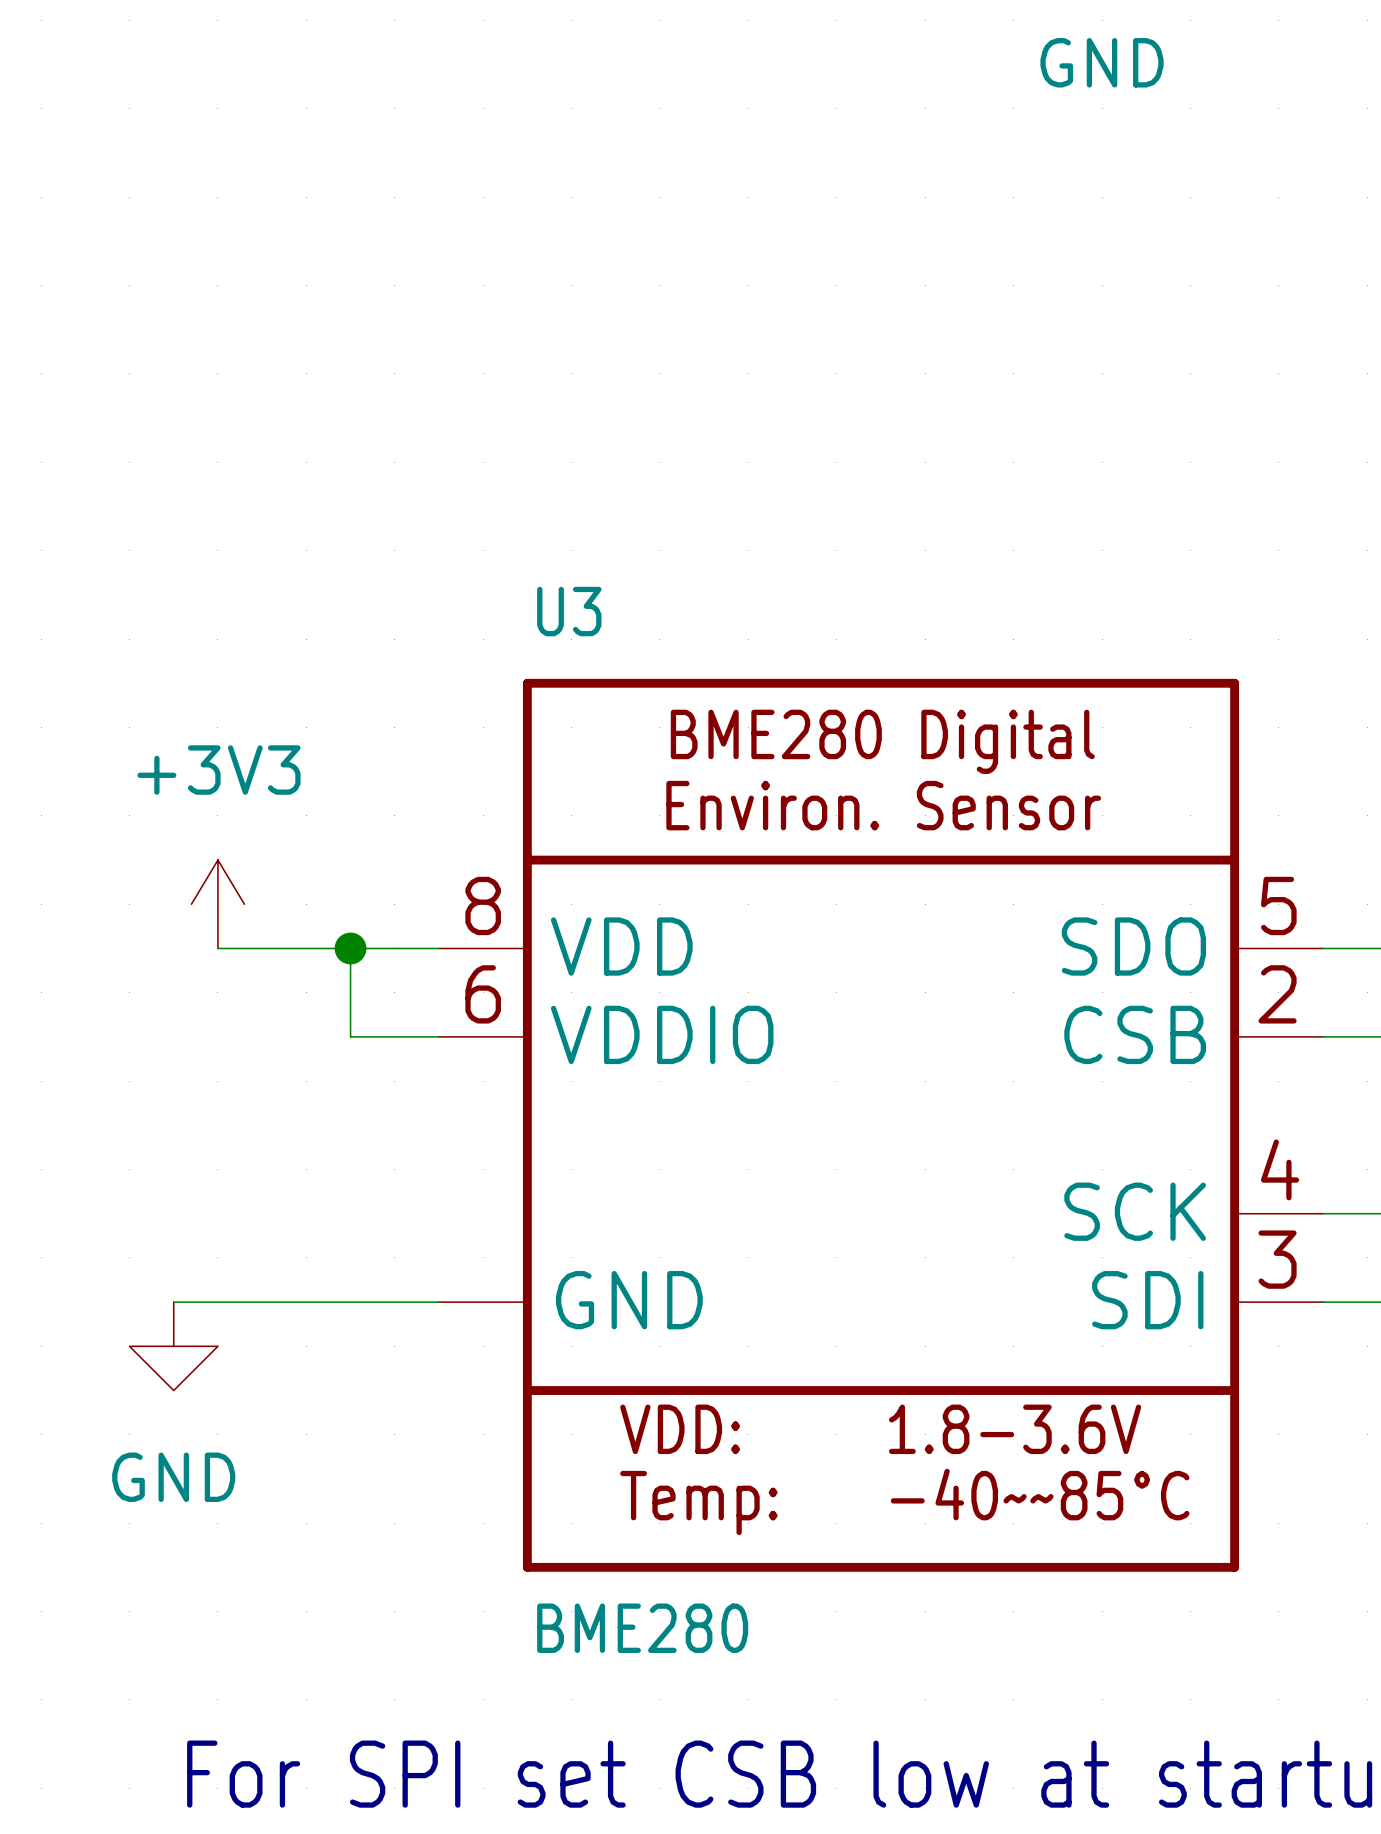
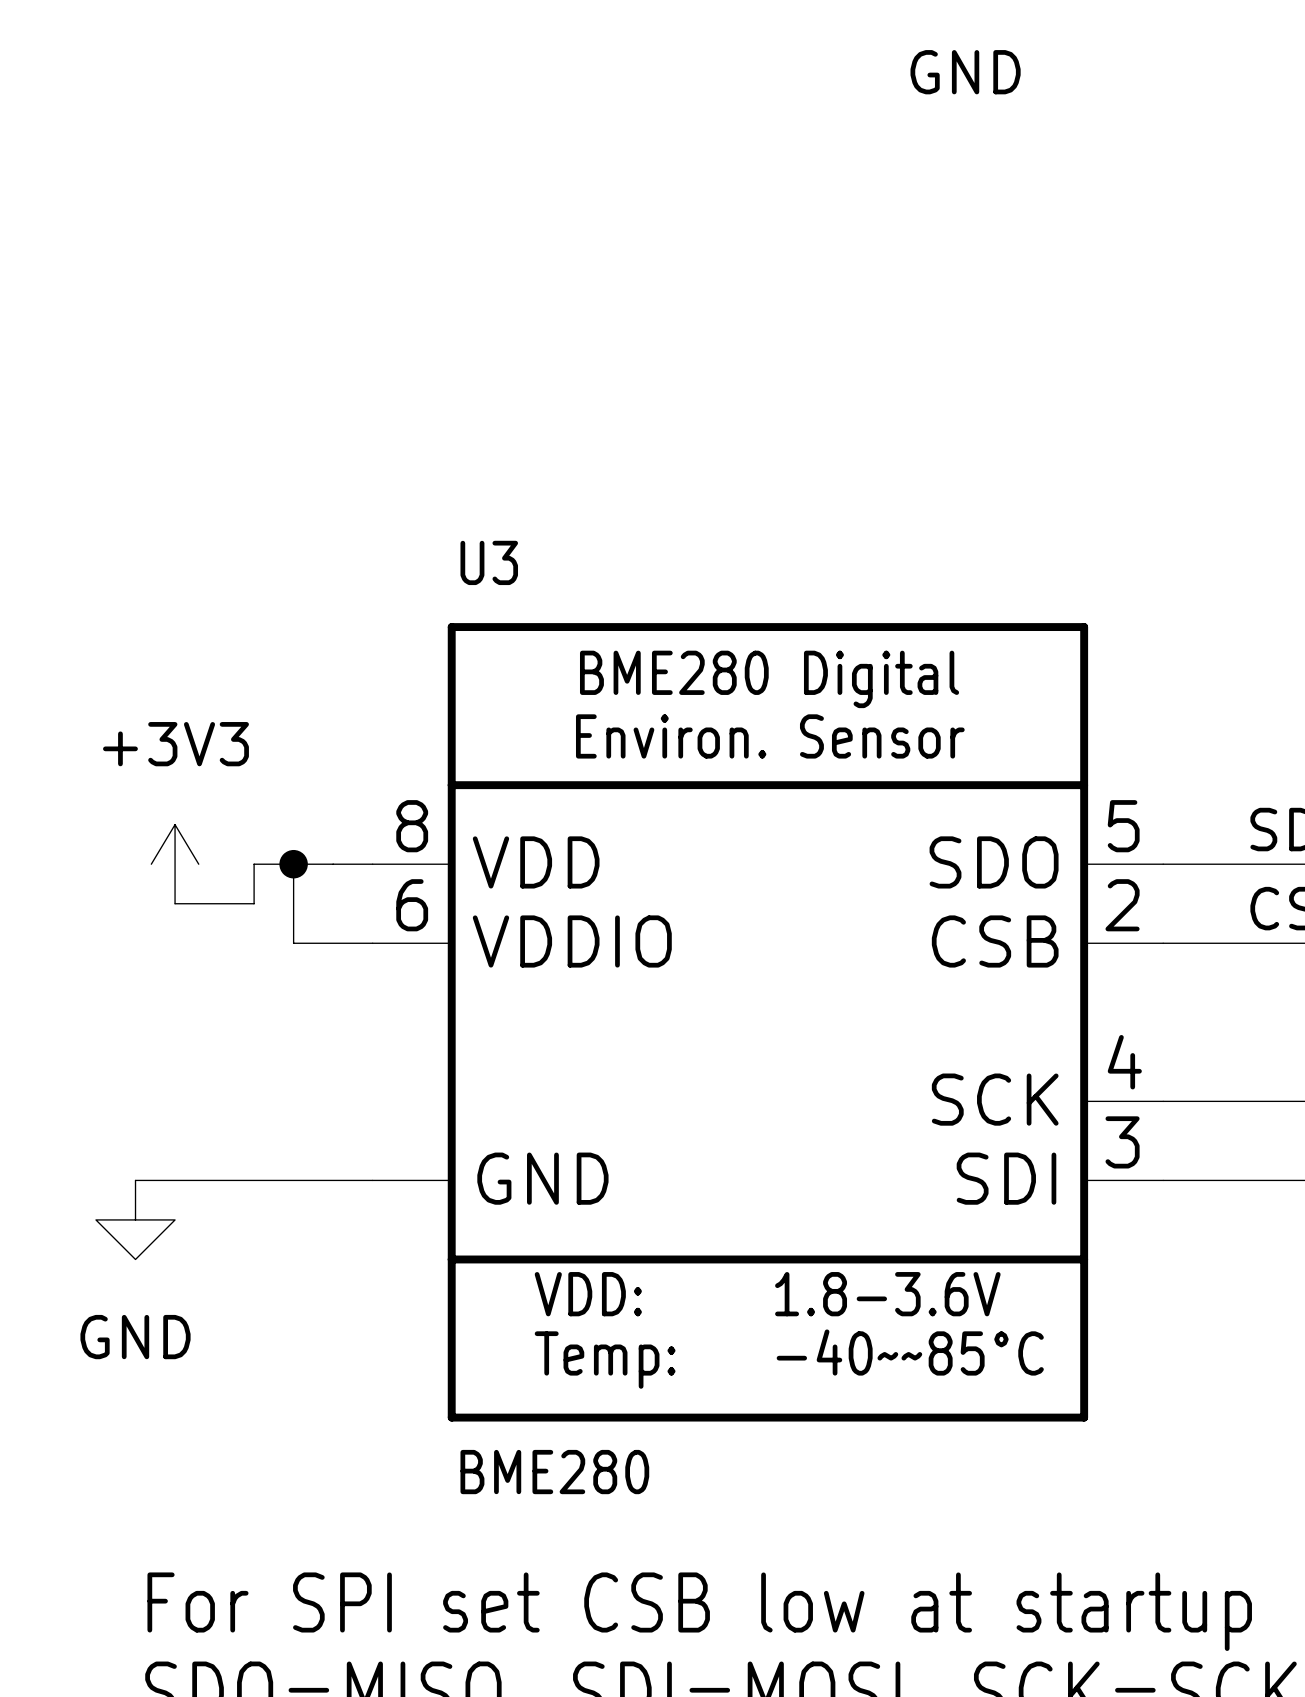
power symbol position: +3V3 (217, 904) -> +3V3 (175, 864)
wire: (217, 948) (306, 948) -> (175, 903) (254, 903) (254, 864)

